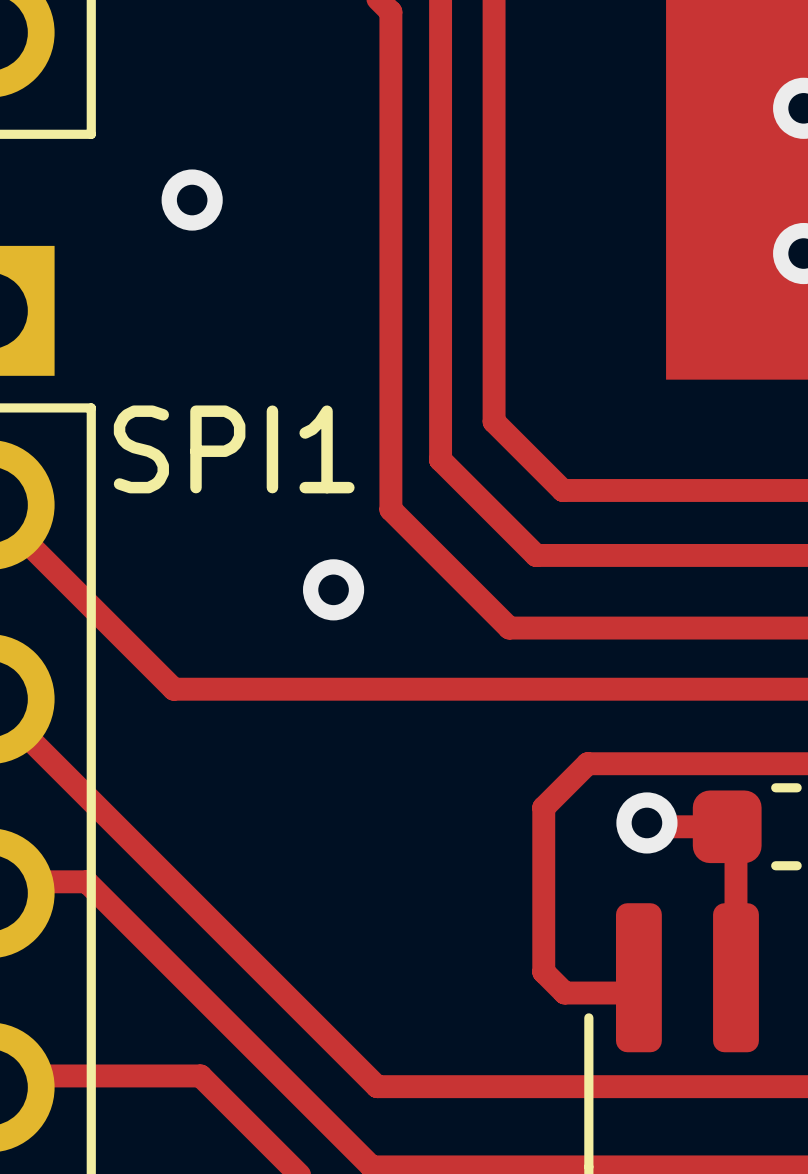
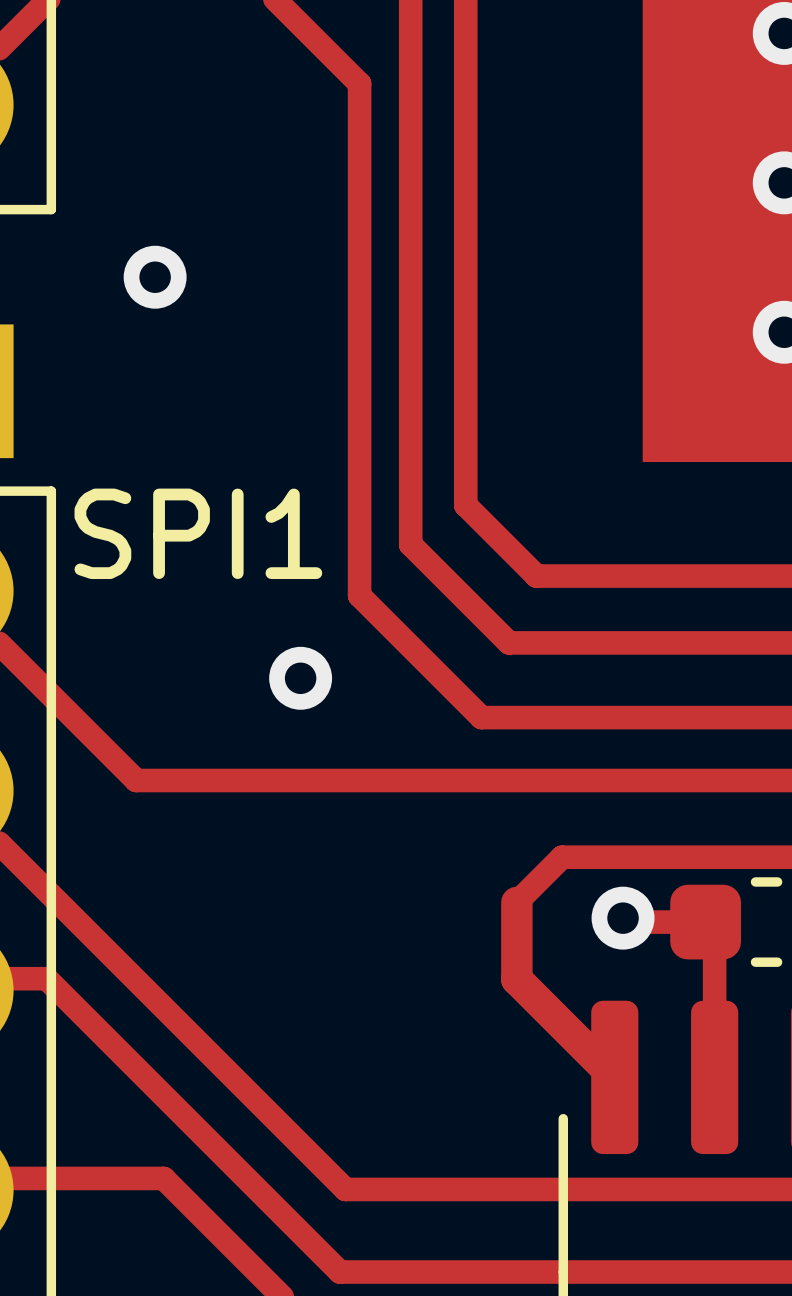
track width: thin (543, 807) (543, 882) -> thick (516, 902) (516, 979)
track: (543, 882) (543, 972) (564, 993) (638, 993) -> (516, 979) (614, 1077)

